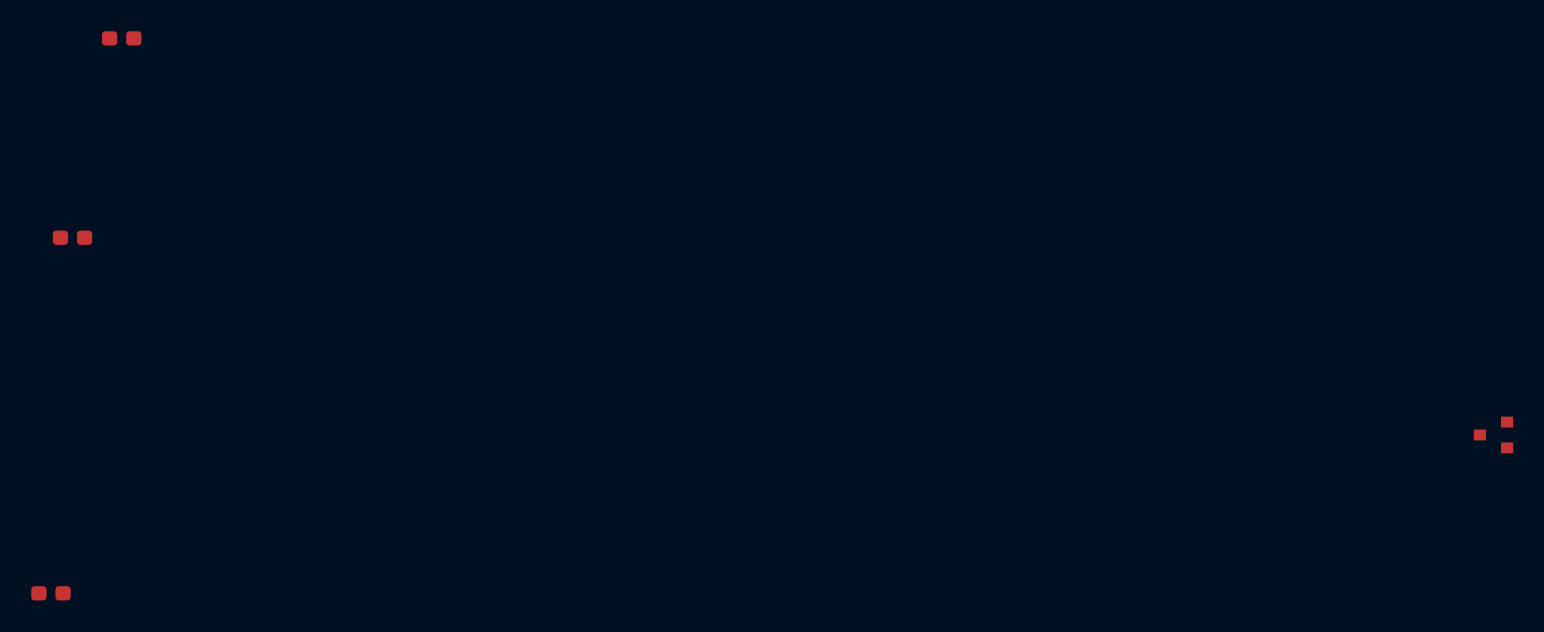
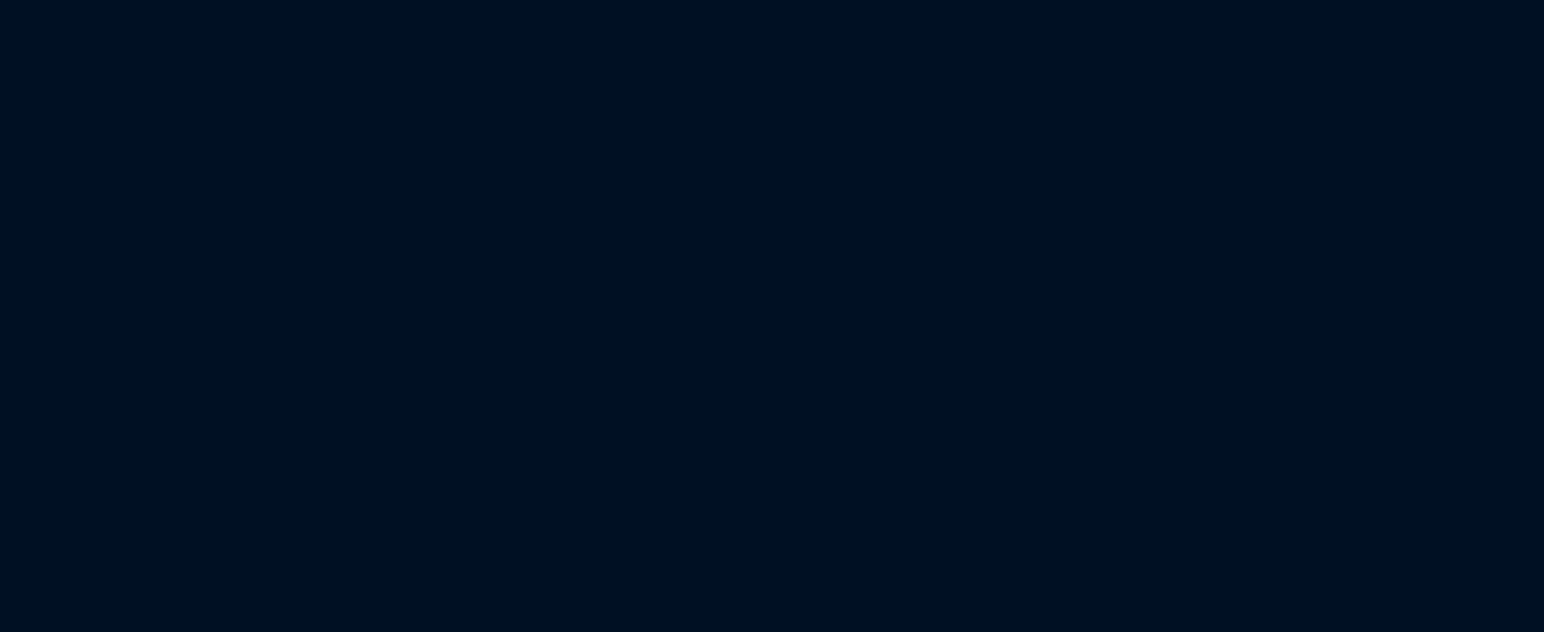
part: (121, 38) -> none
part: (72, 237) -> none
part: (1493, 434) -> none
part: (50, 593) -> none

